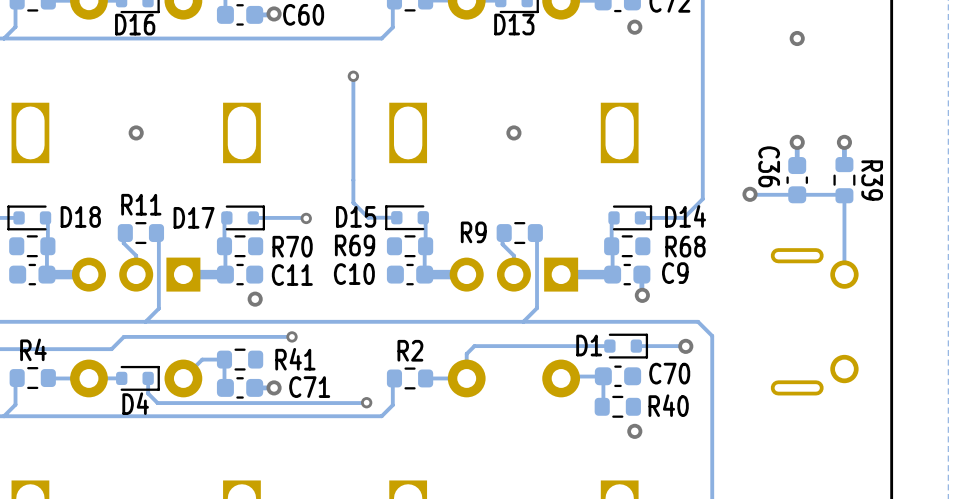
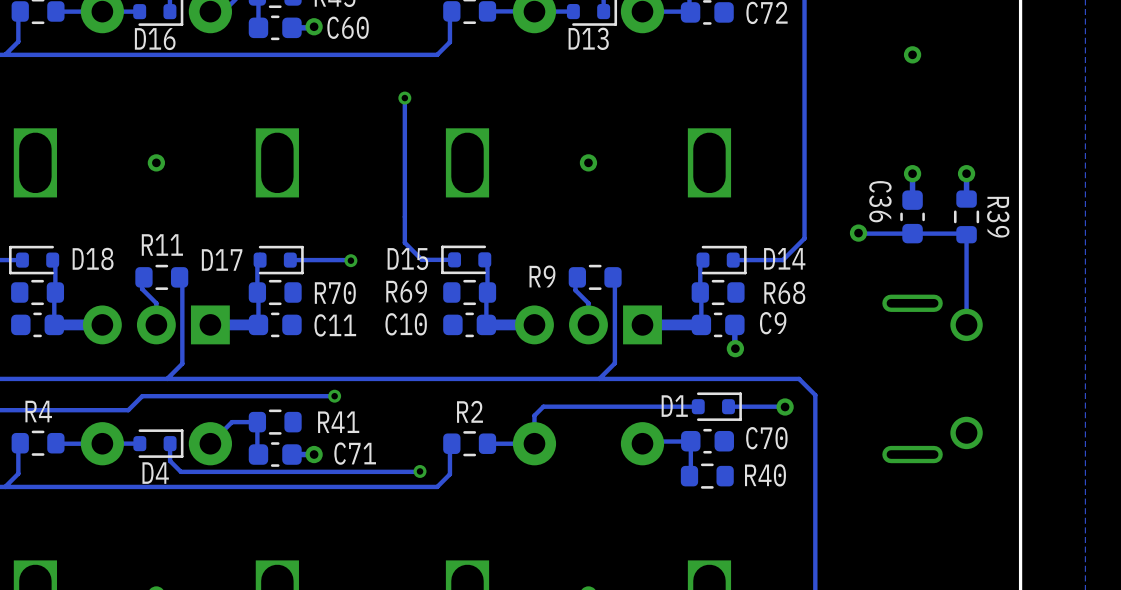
via: (634, 27) -> none
via: (255, 299) -> none
via: (634, 431) -> none

